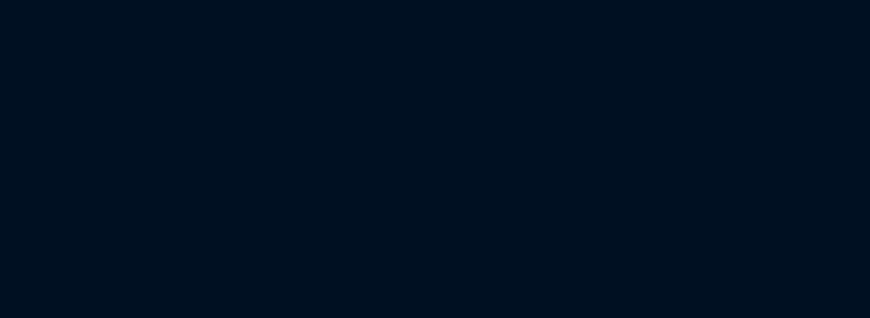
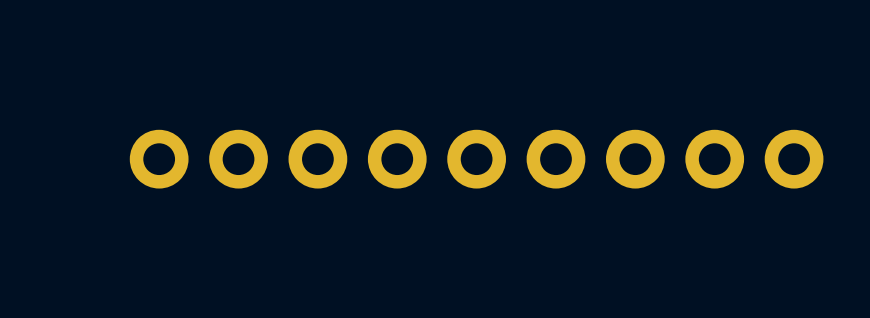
part: none -> (476, 159)

